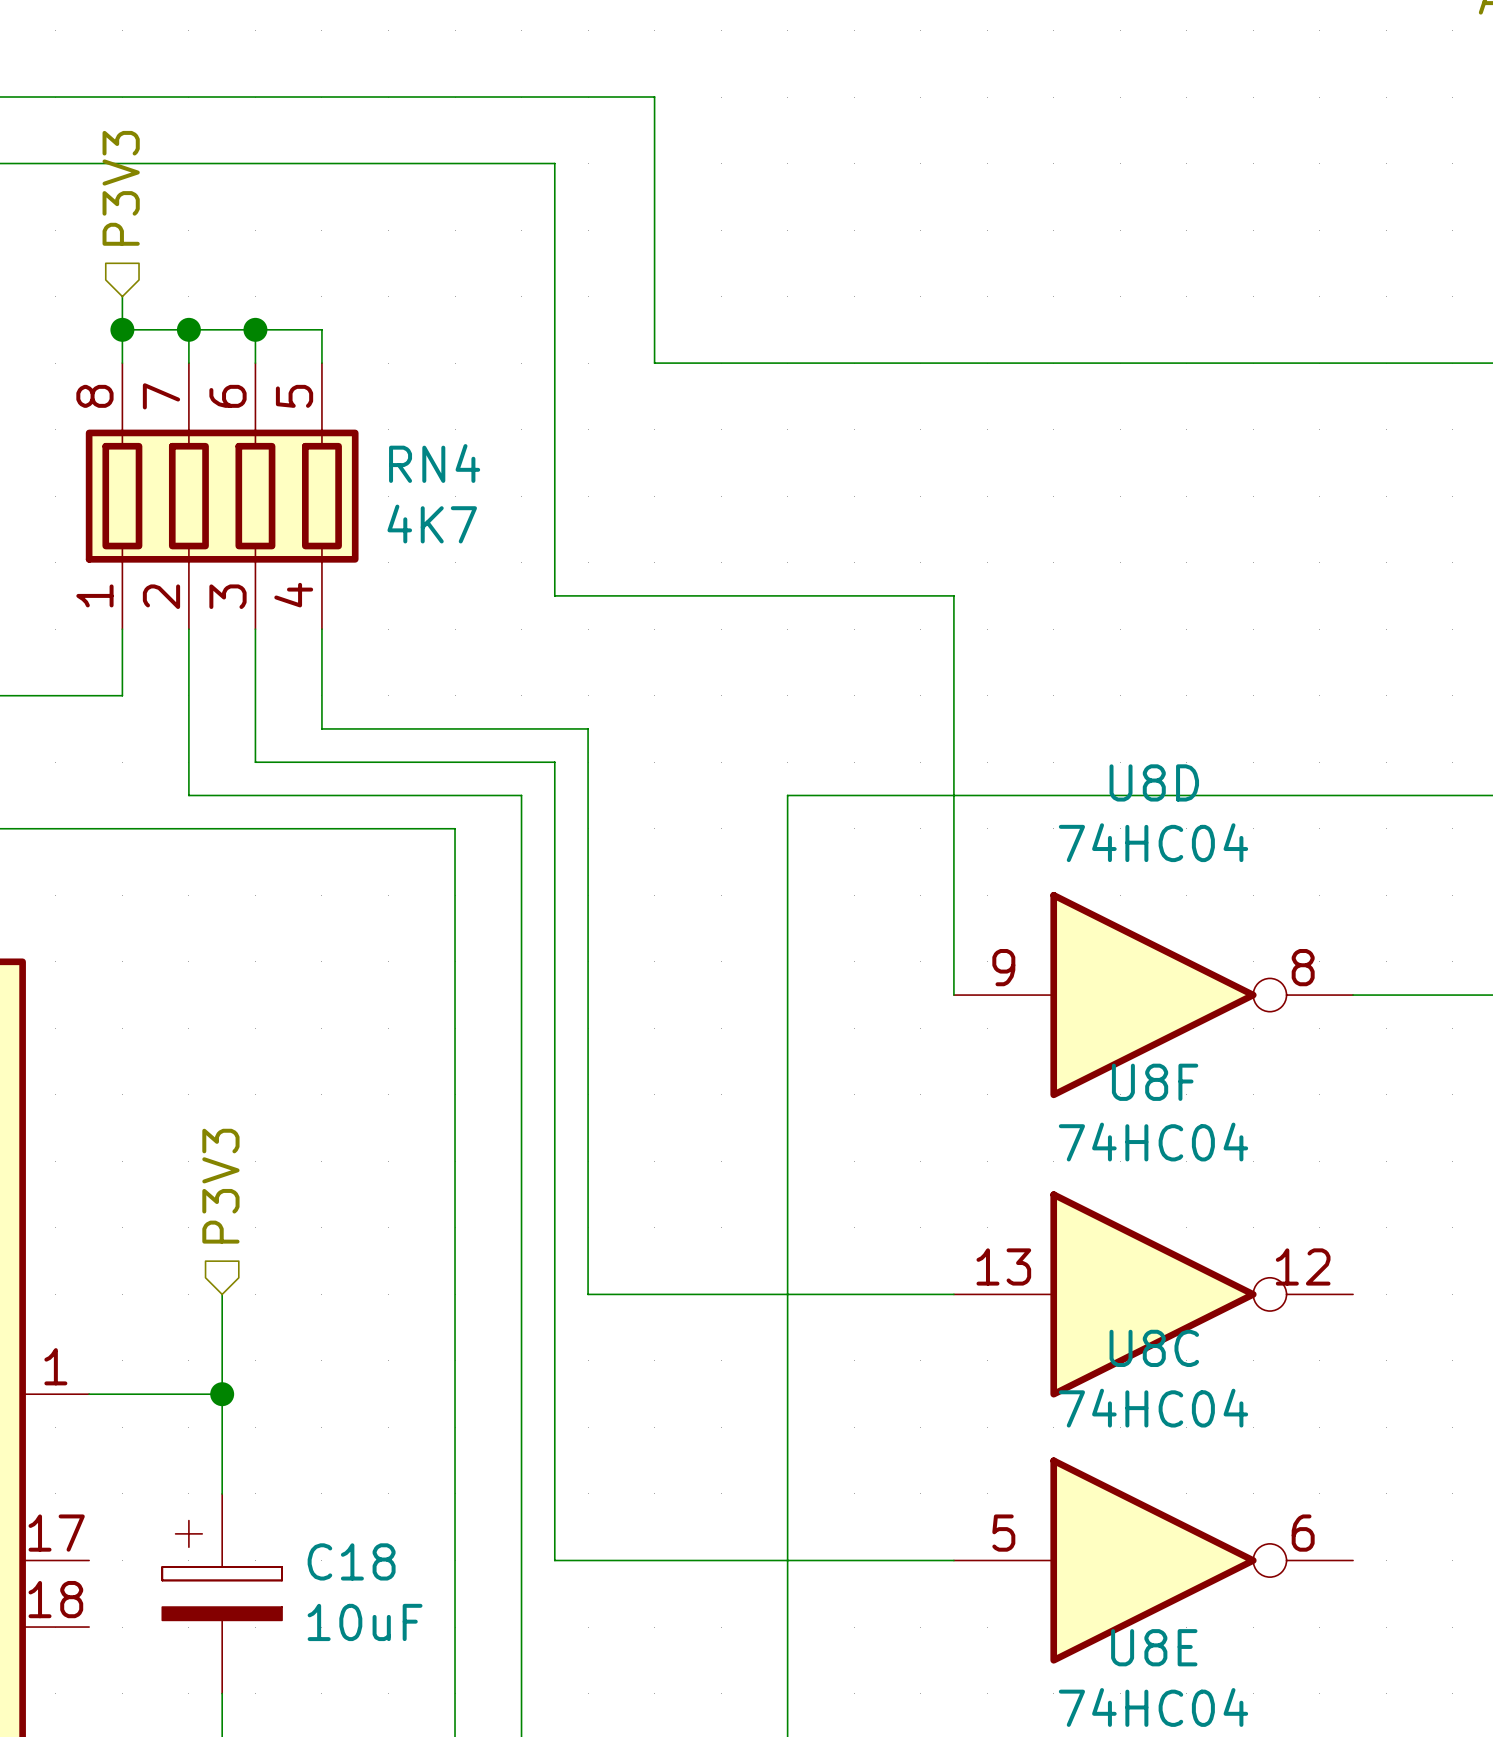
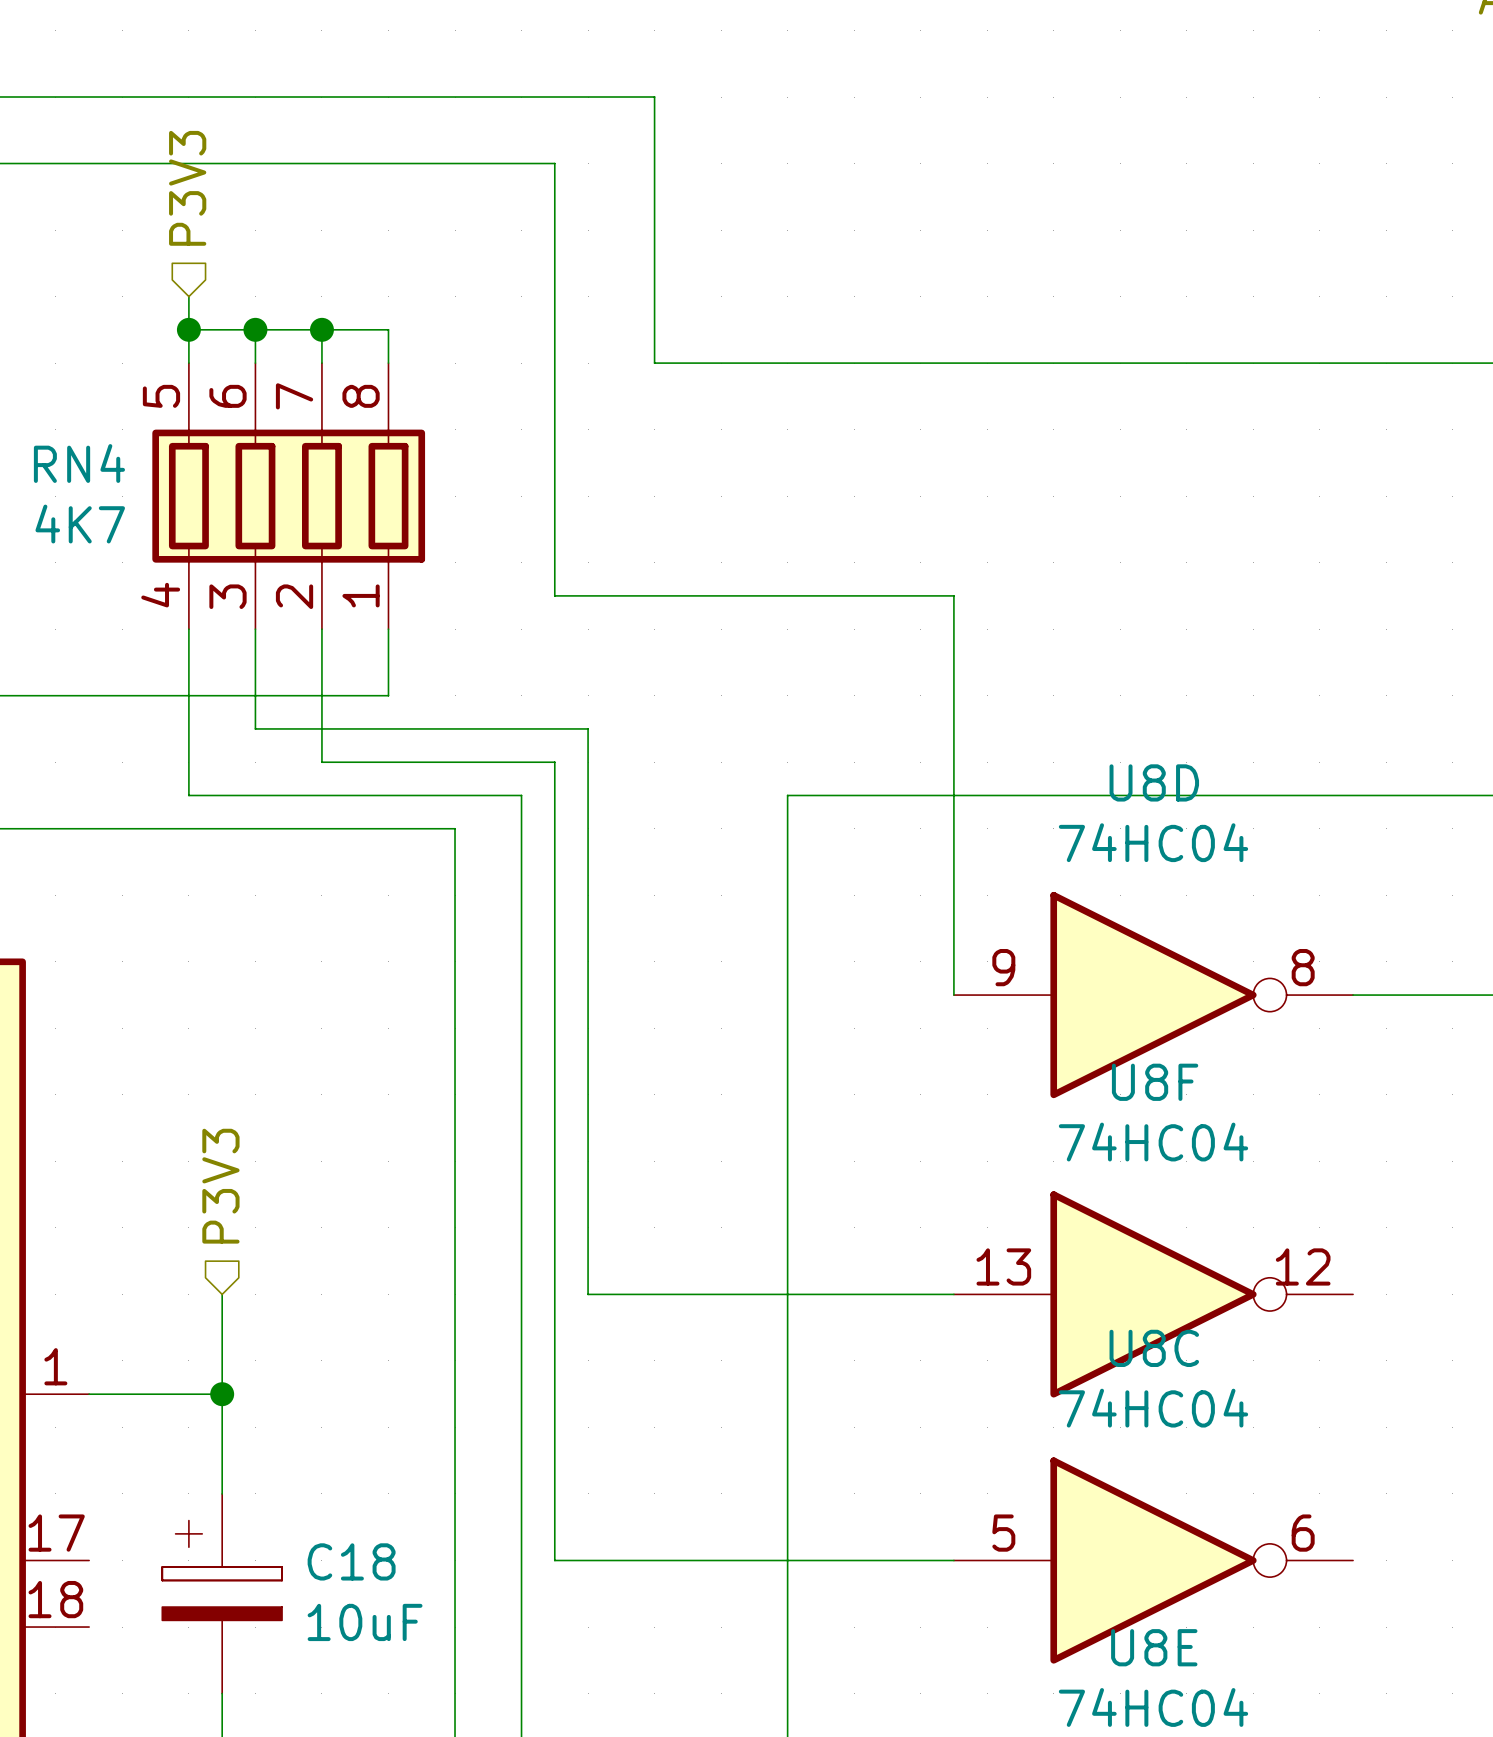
hierarchical label position: P3V3 (121, 188) -> P3V3 (187, 188)
wire: (122, 296) (122, 363) -> none
wire: (122, 329) (188, 329) -> (188, 296) (188, 329)
junction: (122, 329) -> none
wire: none -> (321, 329) (388, 329) (388, 363)
junction: none -> (321, 329)
RN4 flip: as is (222, 496) -> left-right (288, 496)
wire: (122, 629) (122, 695) -> (388, 629) (388, 695) (122, 695)
wire: (255, 728) (255, 762) (321, 762) -> (255, 728) (321, 728) (321, 762)

